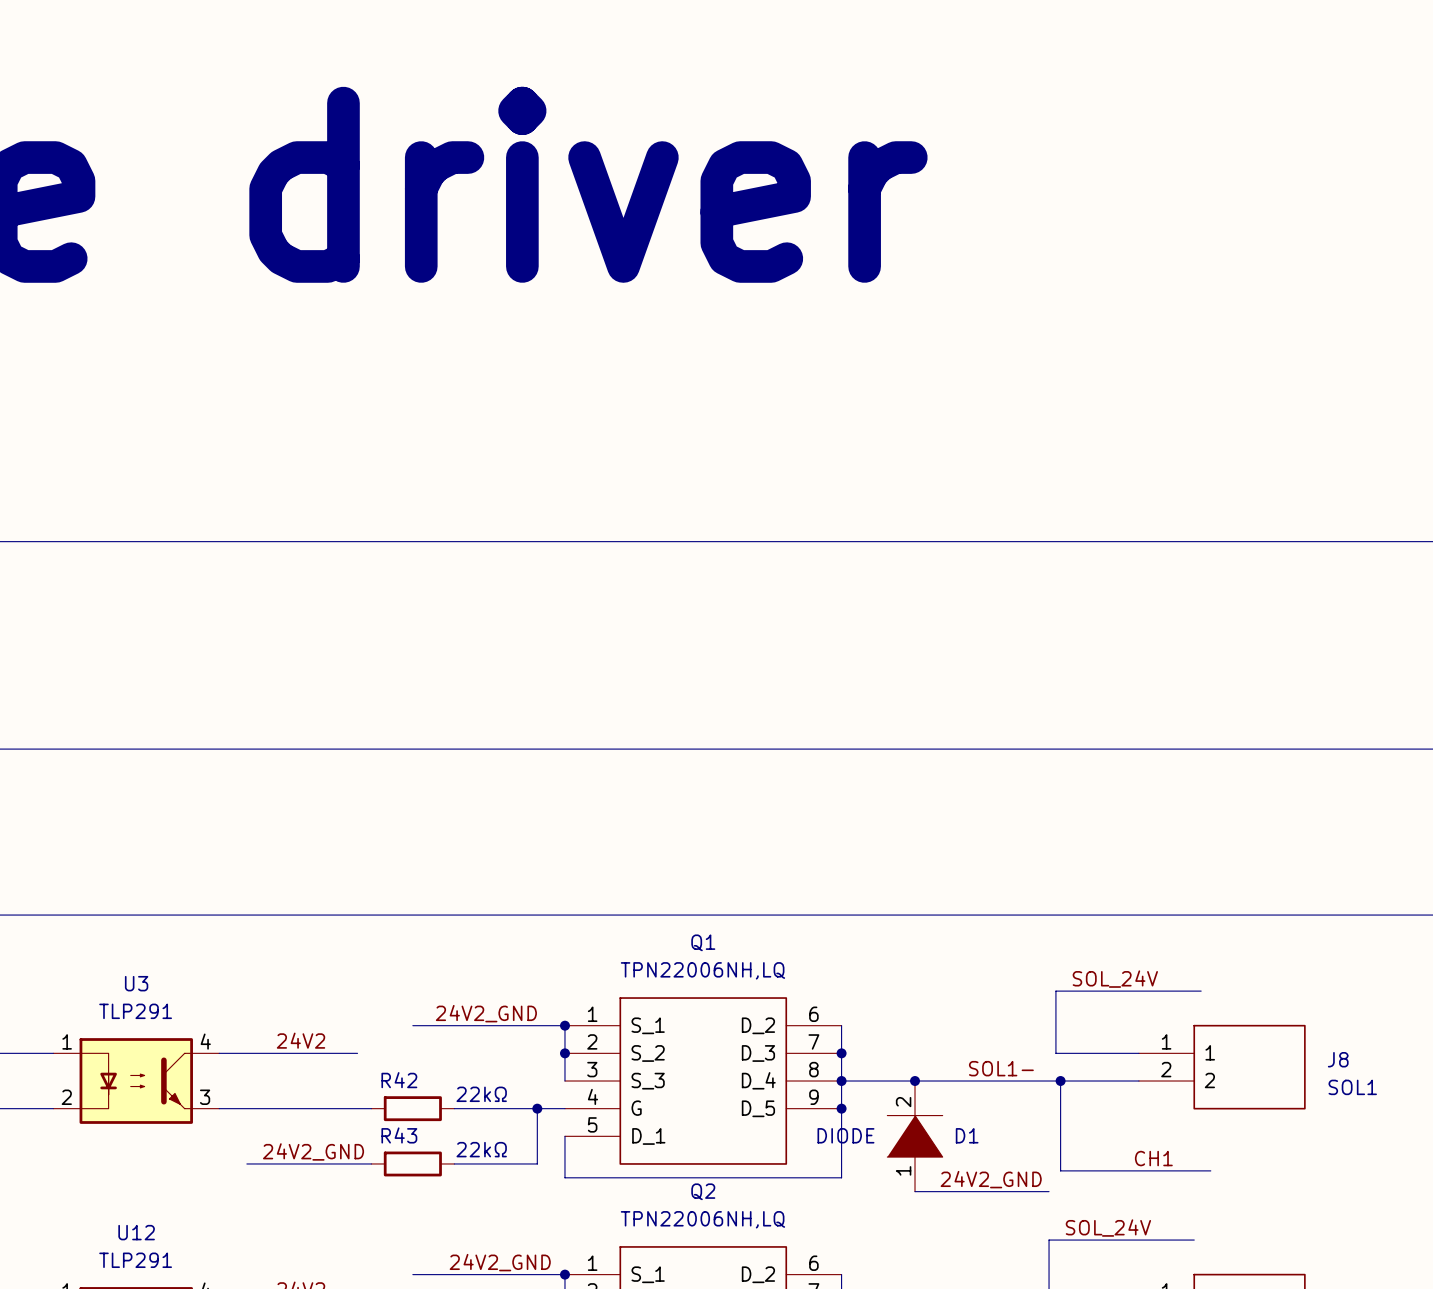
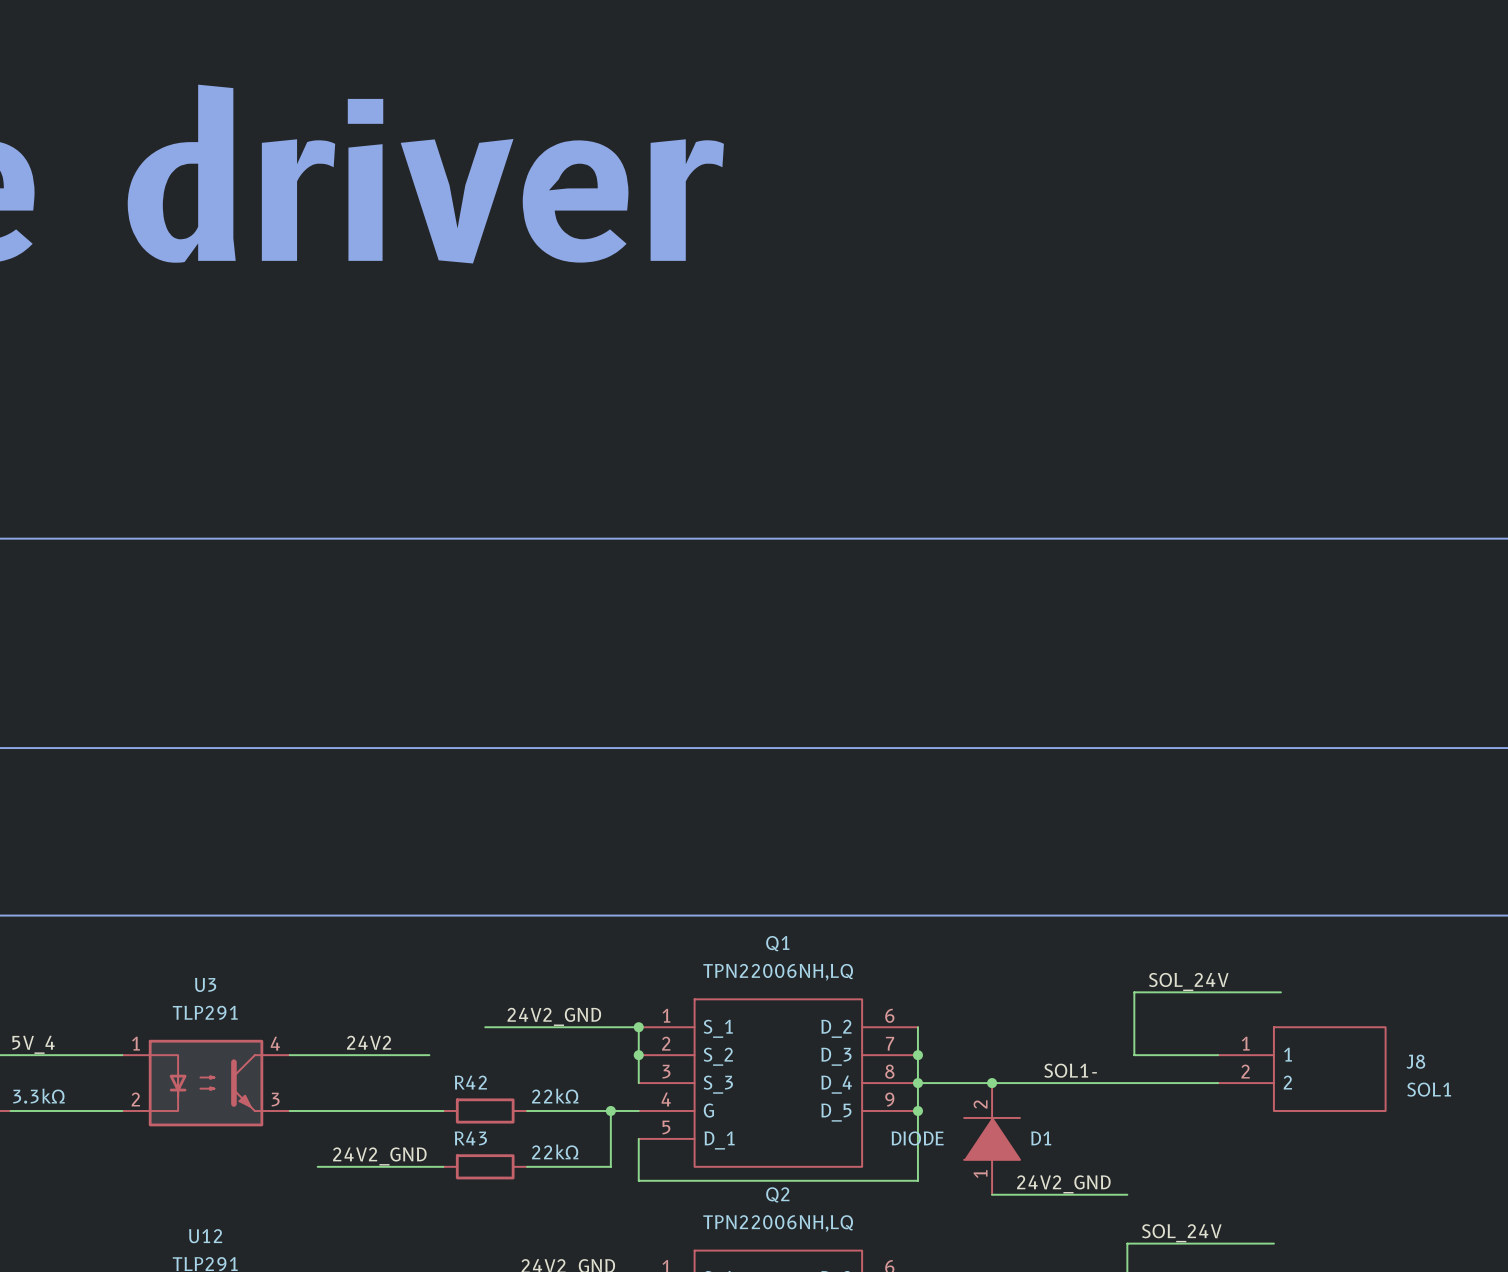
wire: (1060, 1081) (1060, 1170) (1210, 1170) -> none
junction: (1060, 1081) -> none
label: CH1 (1153, 1158) -> none

